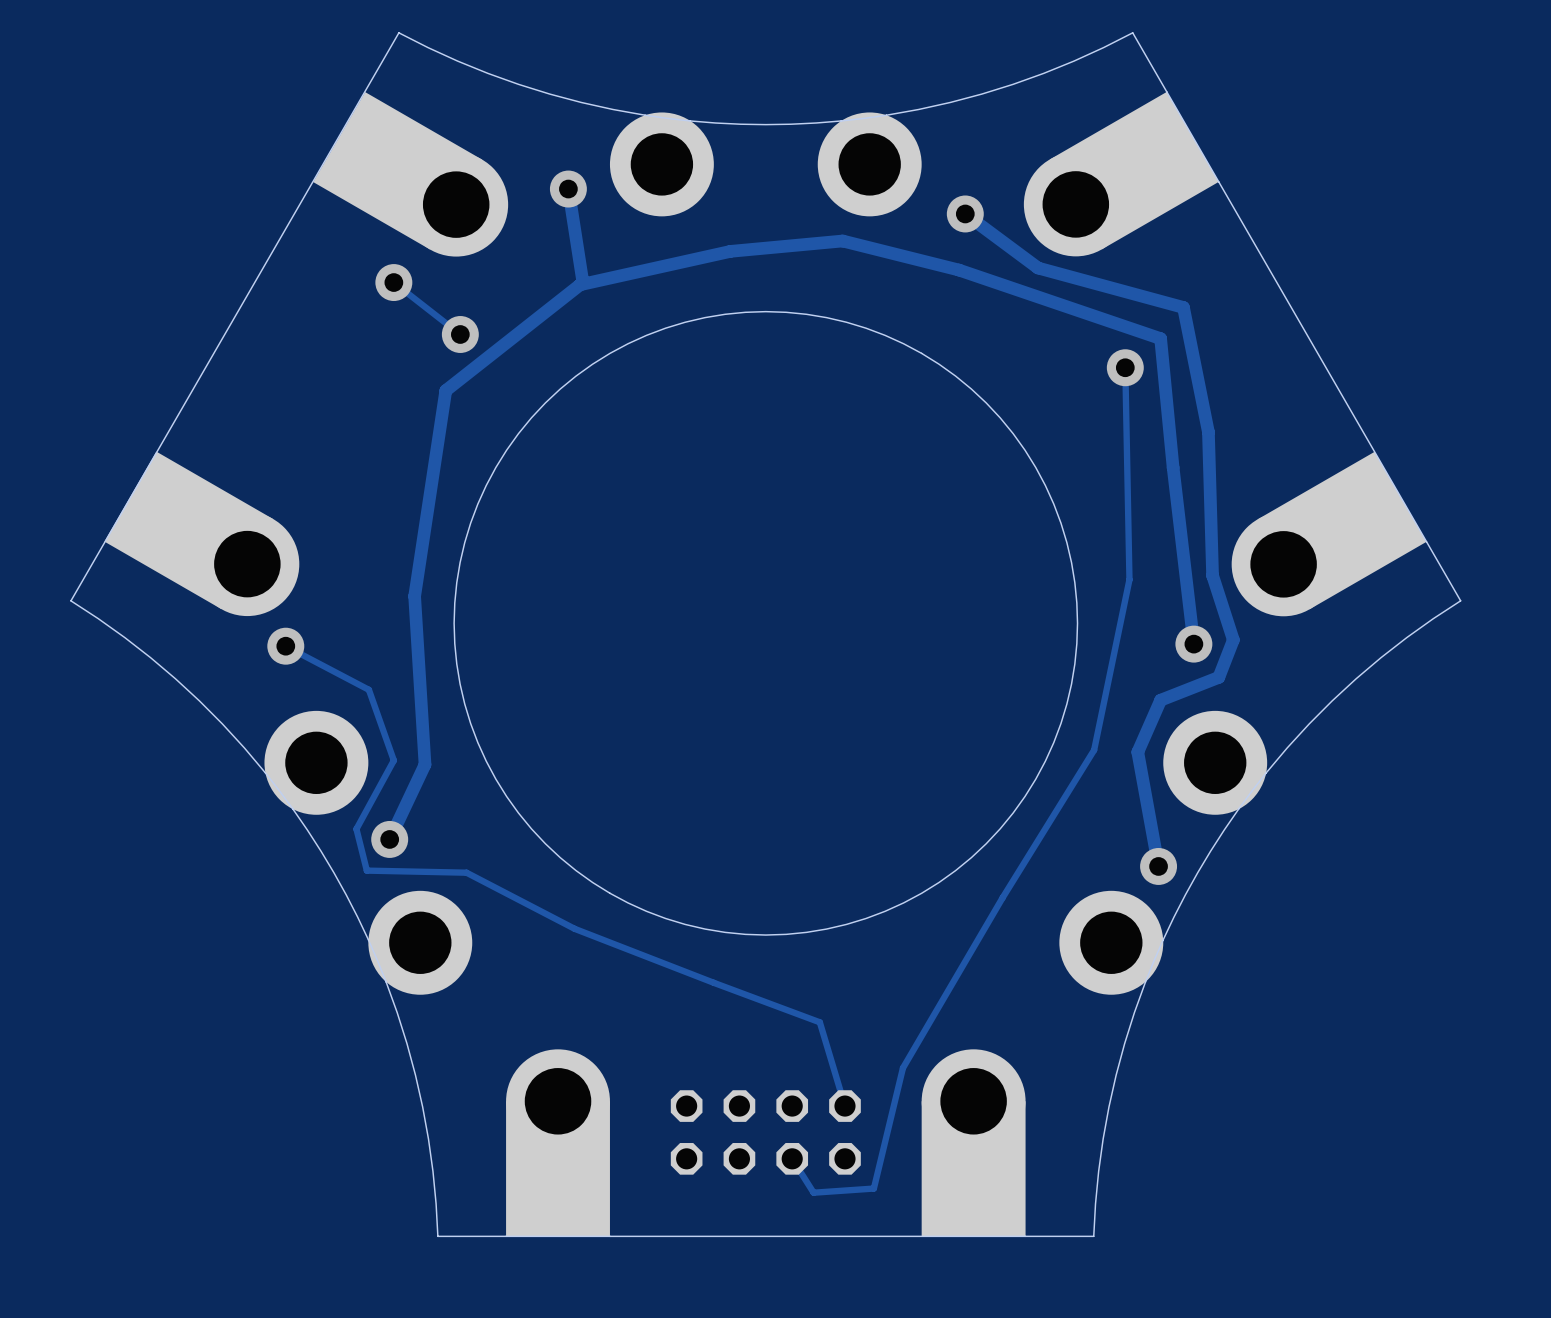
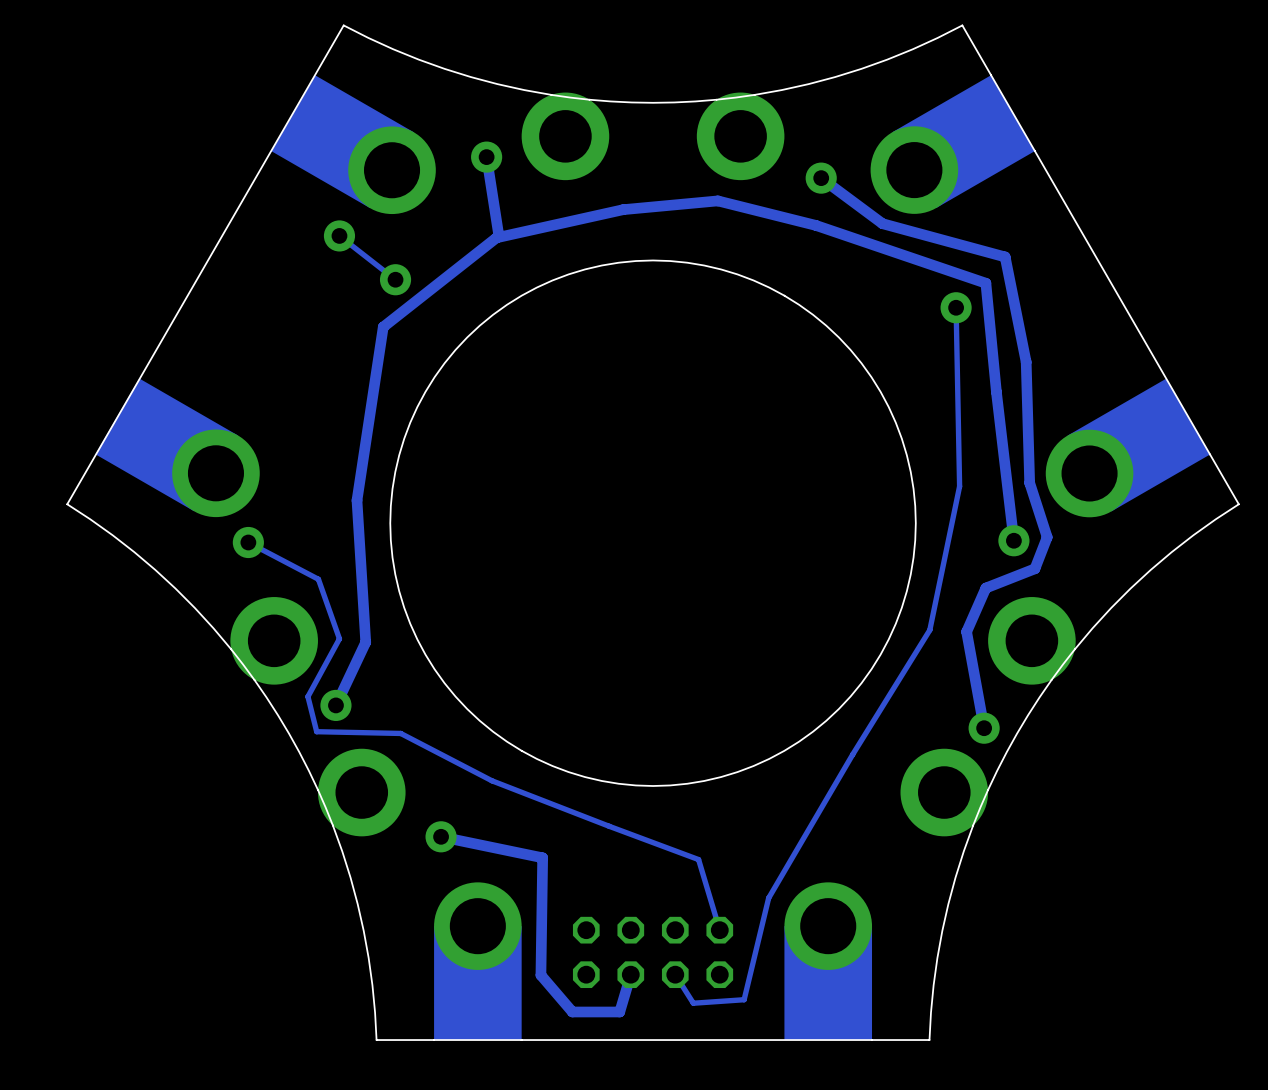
track: none -> (441, 836) (542, 857) (540, 975) (572, 1011) (619, 1011) (630, 974)
via: none -> (441, 836)

